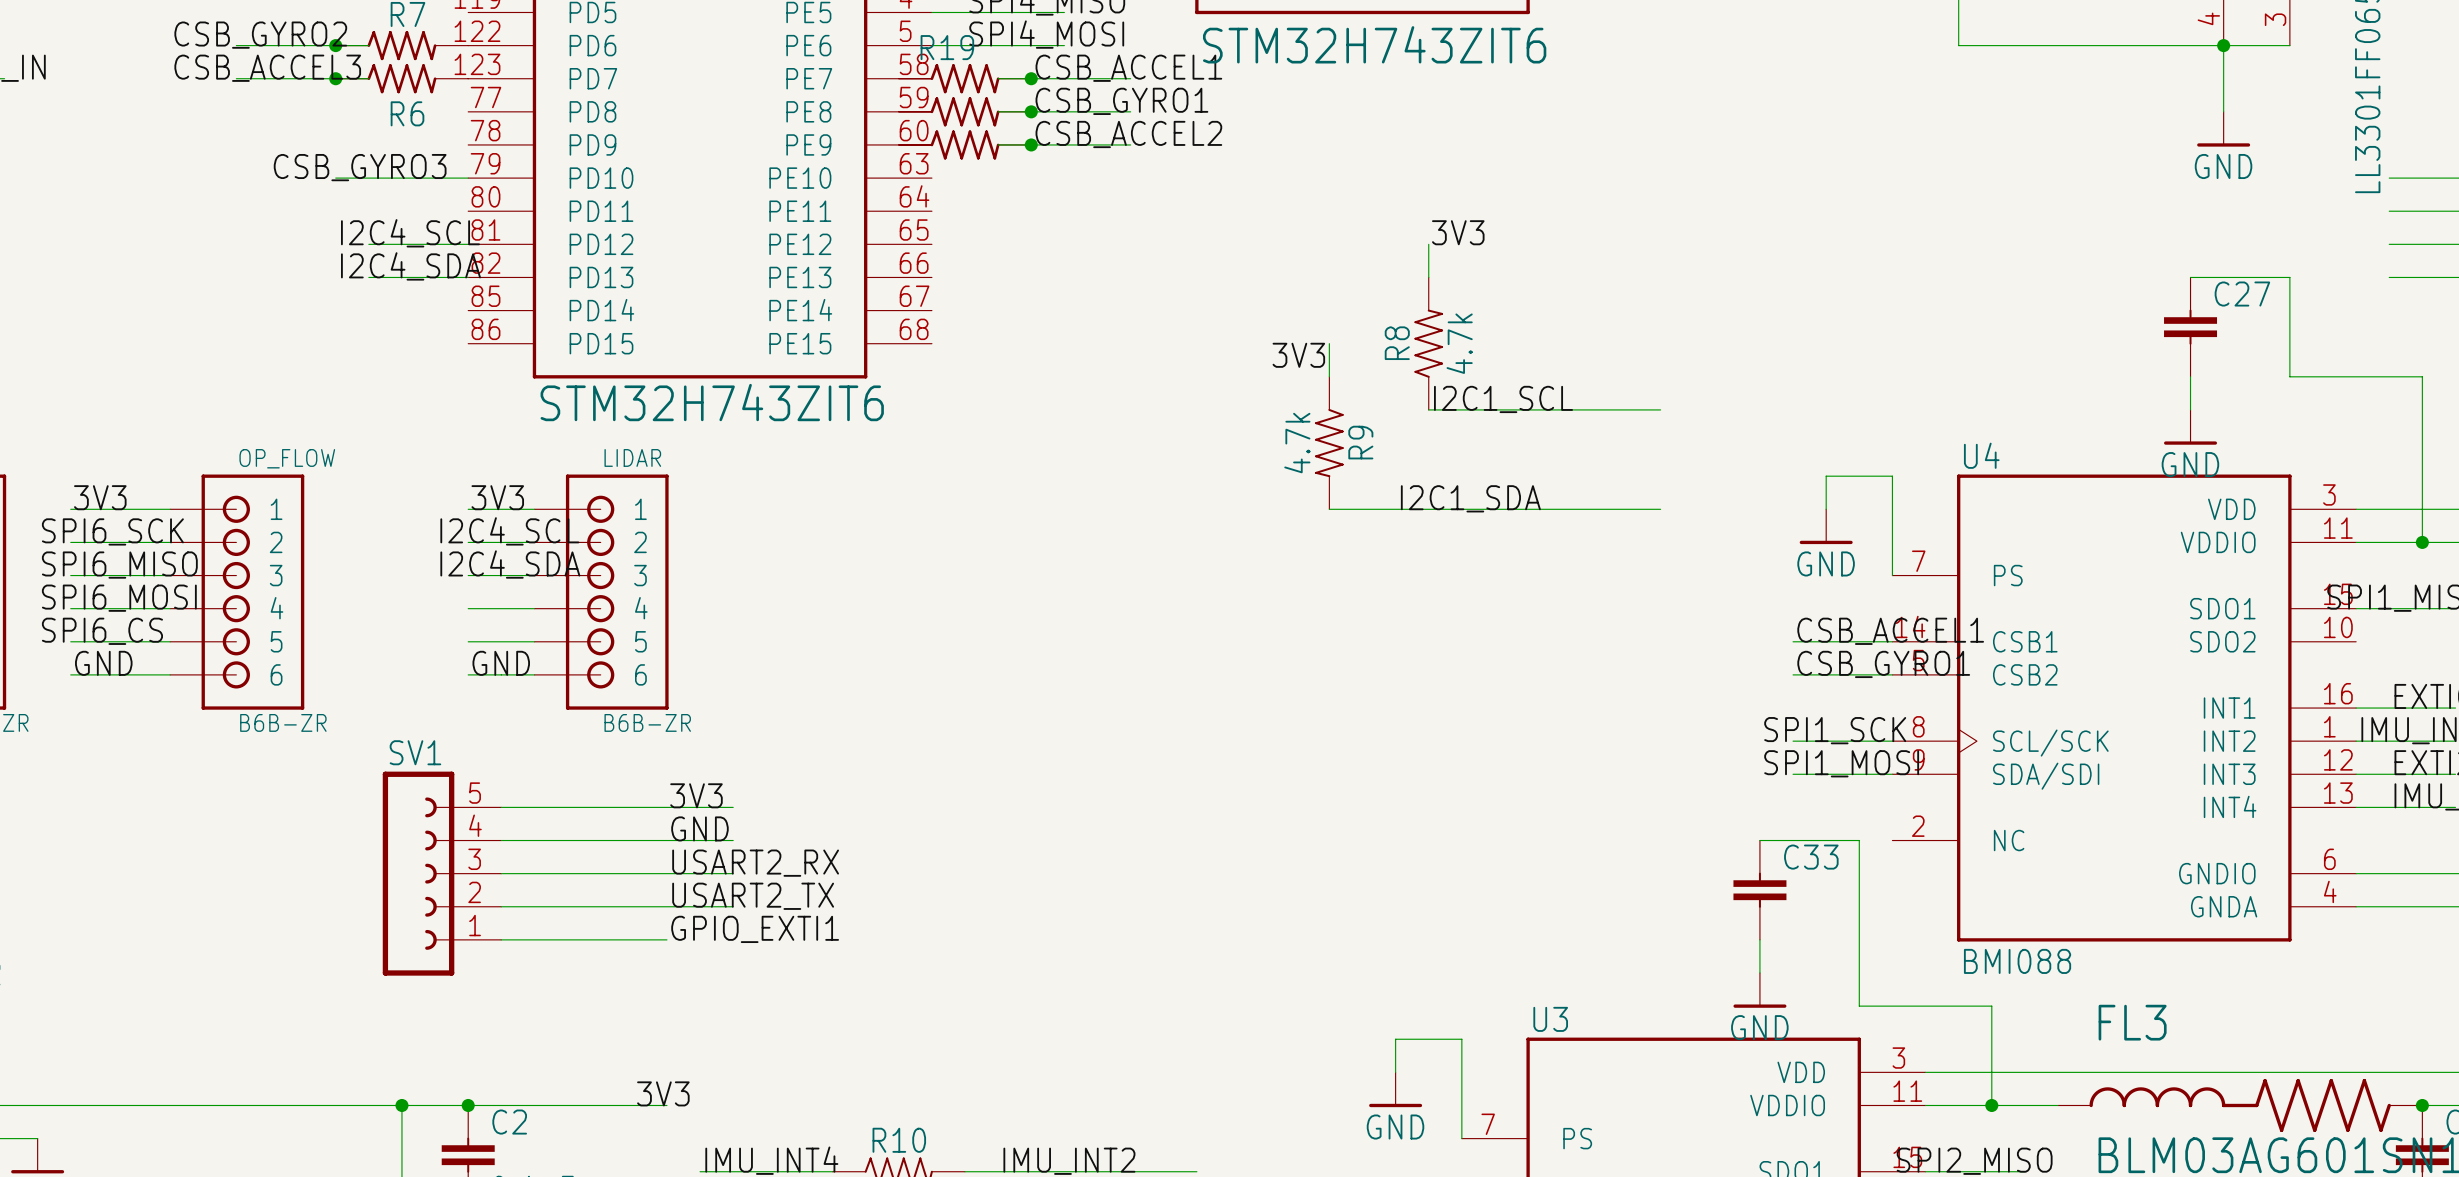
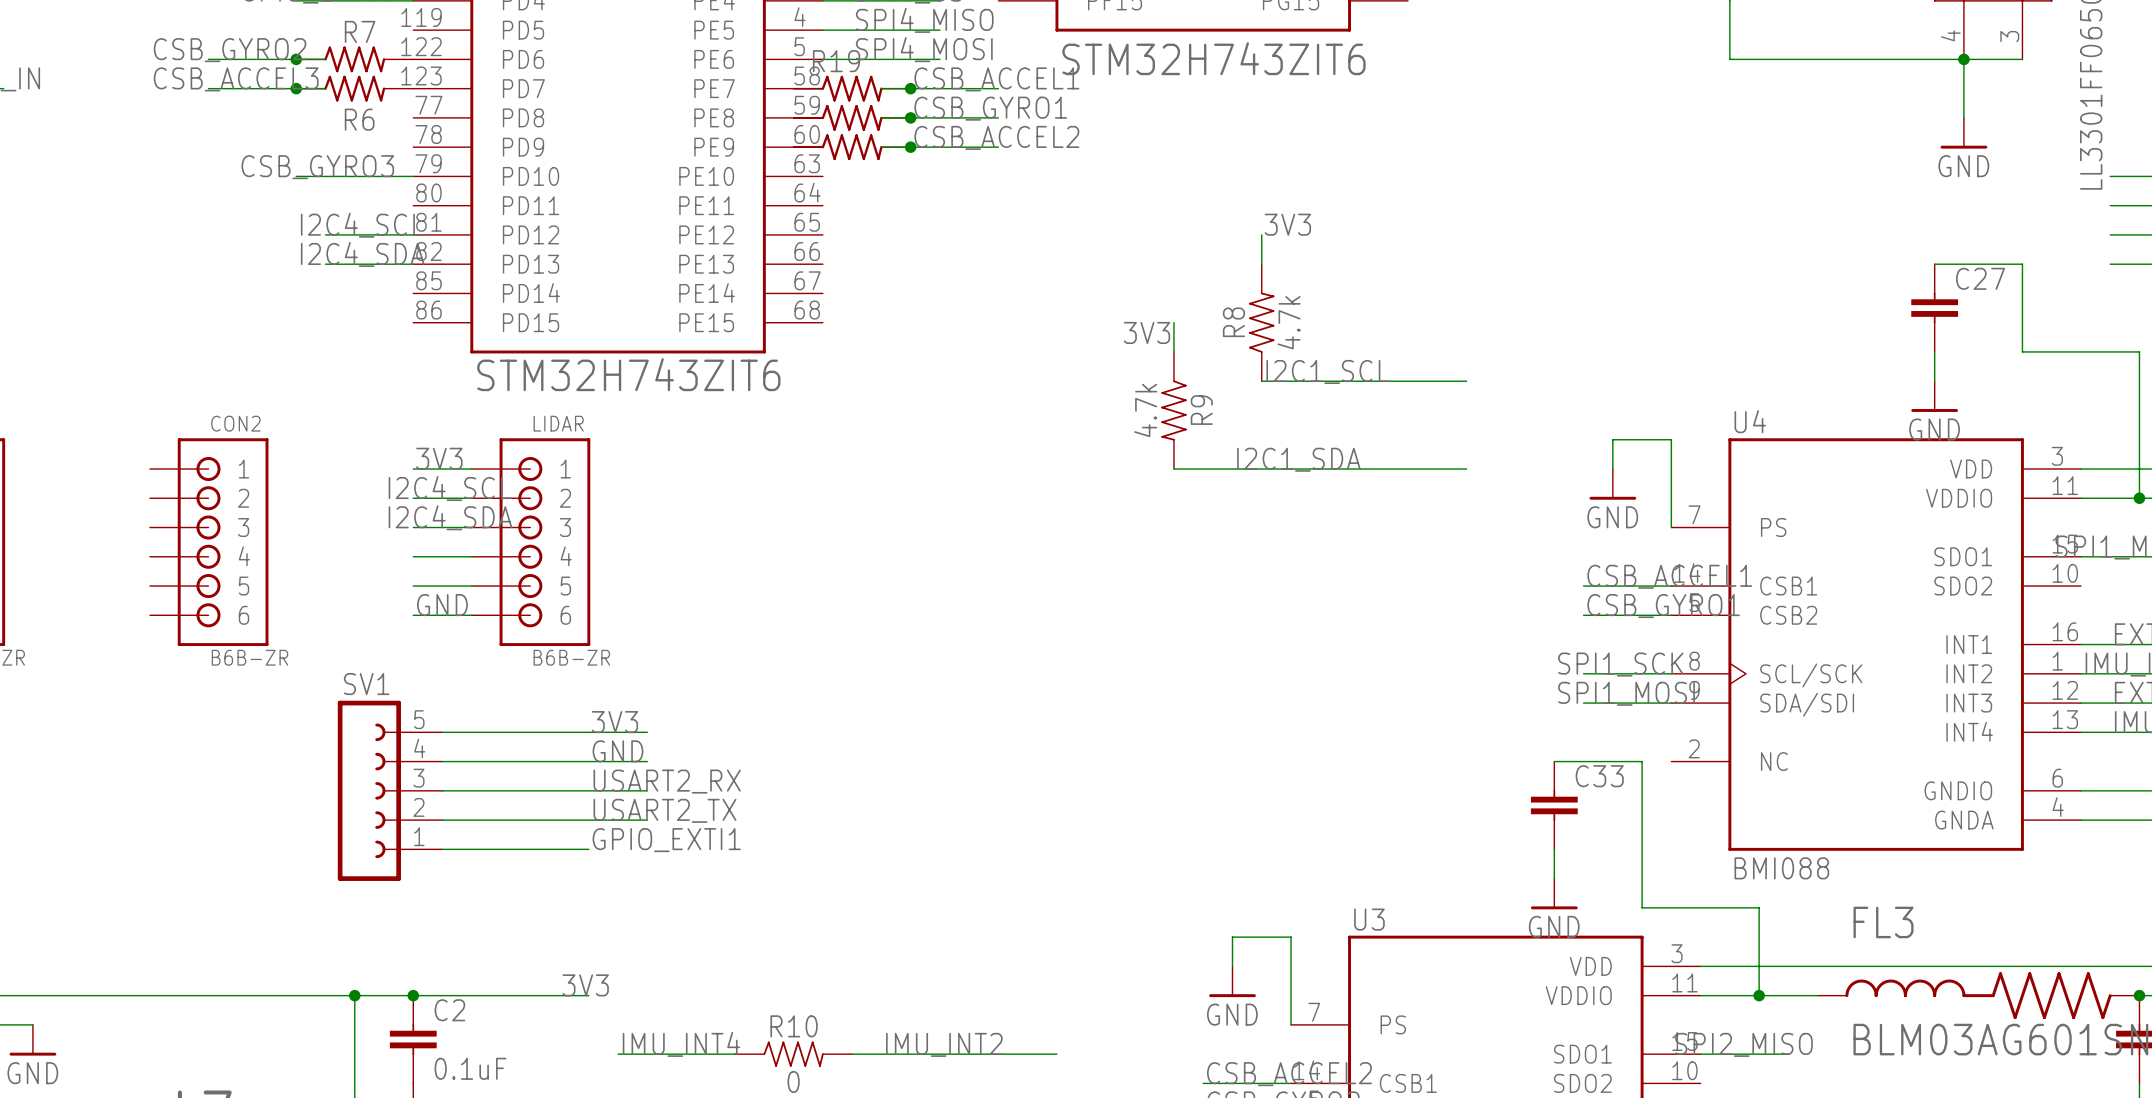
OP_FLOW name: OP_FLOW (287, 458) -> CON2 (235, 423)
label: 3V3 (100, 497) -> none
wire: (70, 509) (170, 509) -> none
label: SPI6_SCK (112, 531) -> none
wire: (70, 542) (170, 542) -> none
label: SPI6_MISO (119, 565) -> none
wire: (70, 575) (170, 575) -> none
label: SPI6_MOSI (119, 598) -> none
wire: (70, 608) (170, 608) -> none
label: SPI6_CS (102, 631) -> none
wire: (70, 641) (170, 641) -> none
label: GND (103, 663) -> none
wire: (70, 674) (170, 674) -> none

